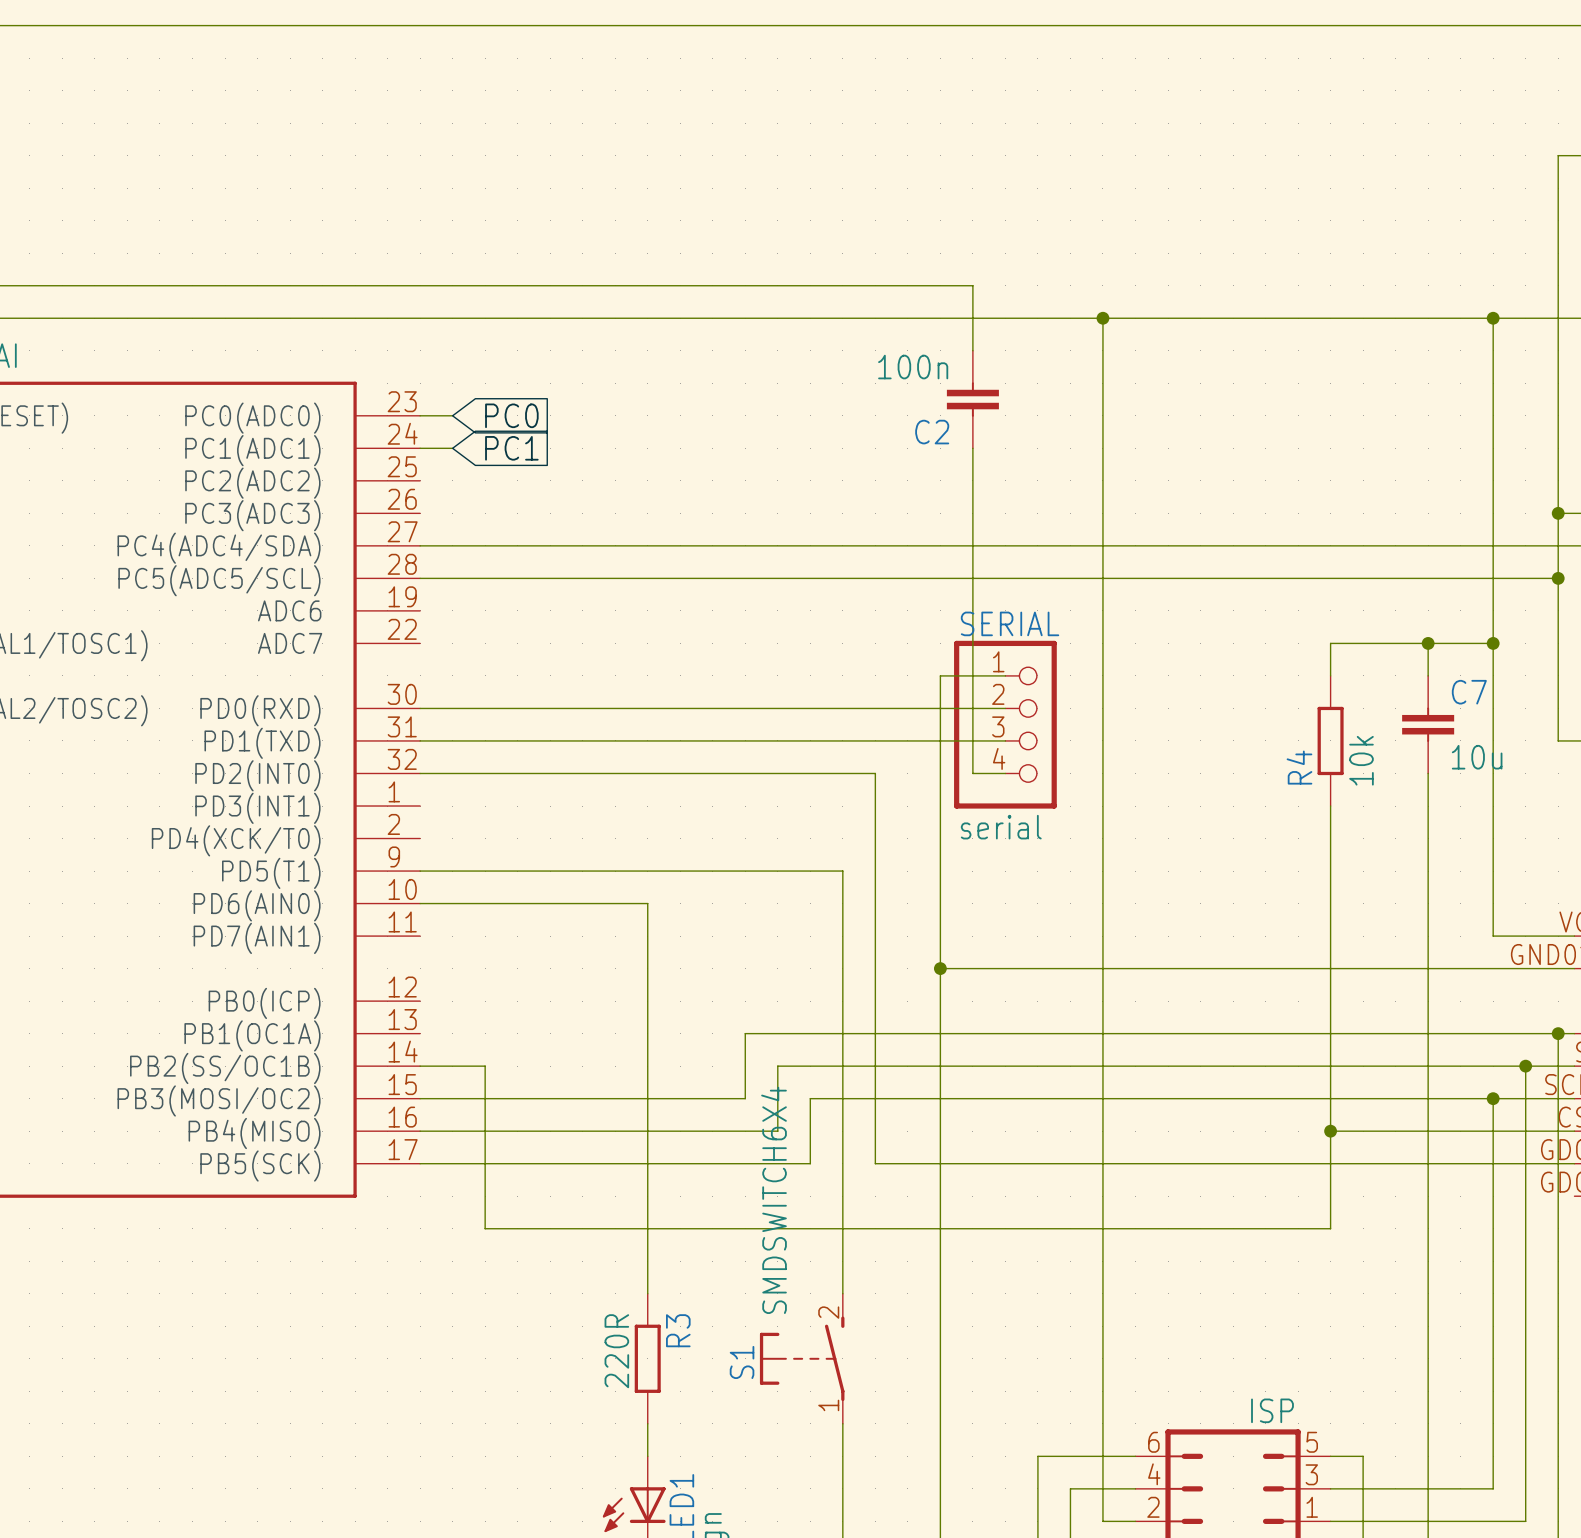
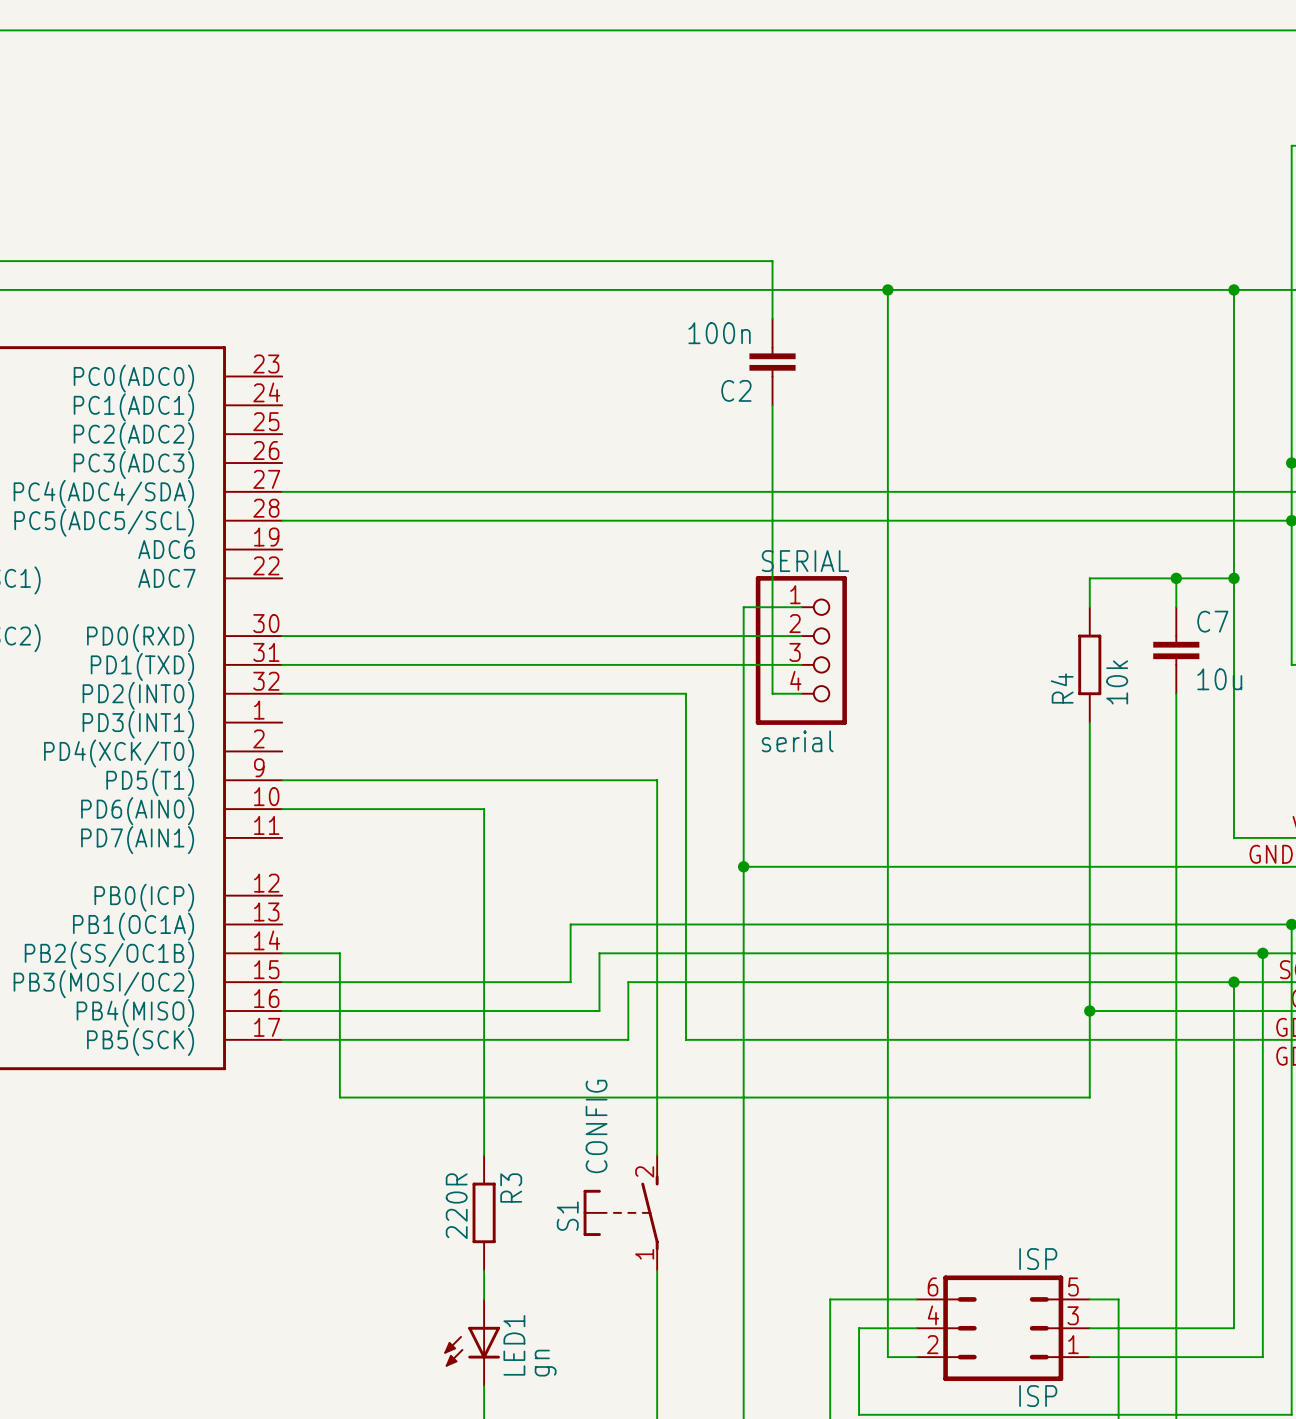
wire: (420, 415) (452, 415) -> none
global label: PC0 (511, 415) -> none
wire: (420, 448) (452, 448) -> none
global label: PC1 (511, 448) -> none
S1 value: SMDSWITCH6X4 (774, 1200) -> CONFIG (596, 1126)

